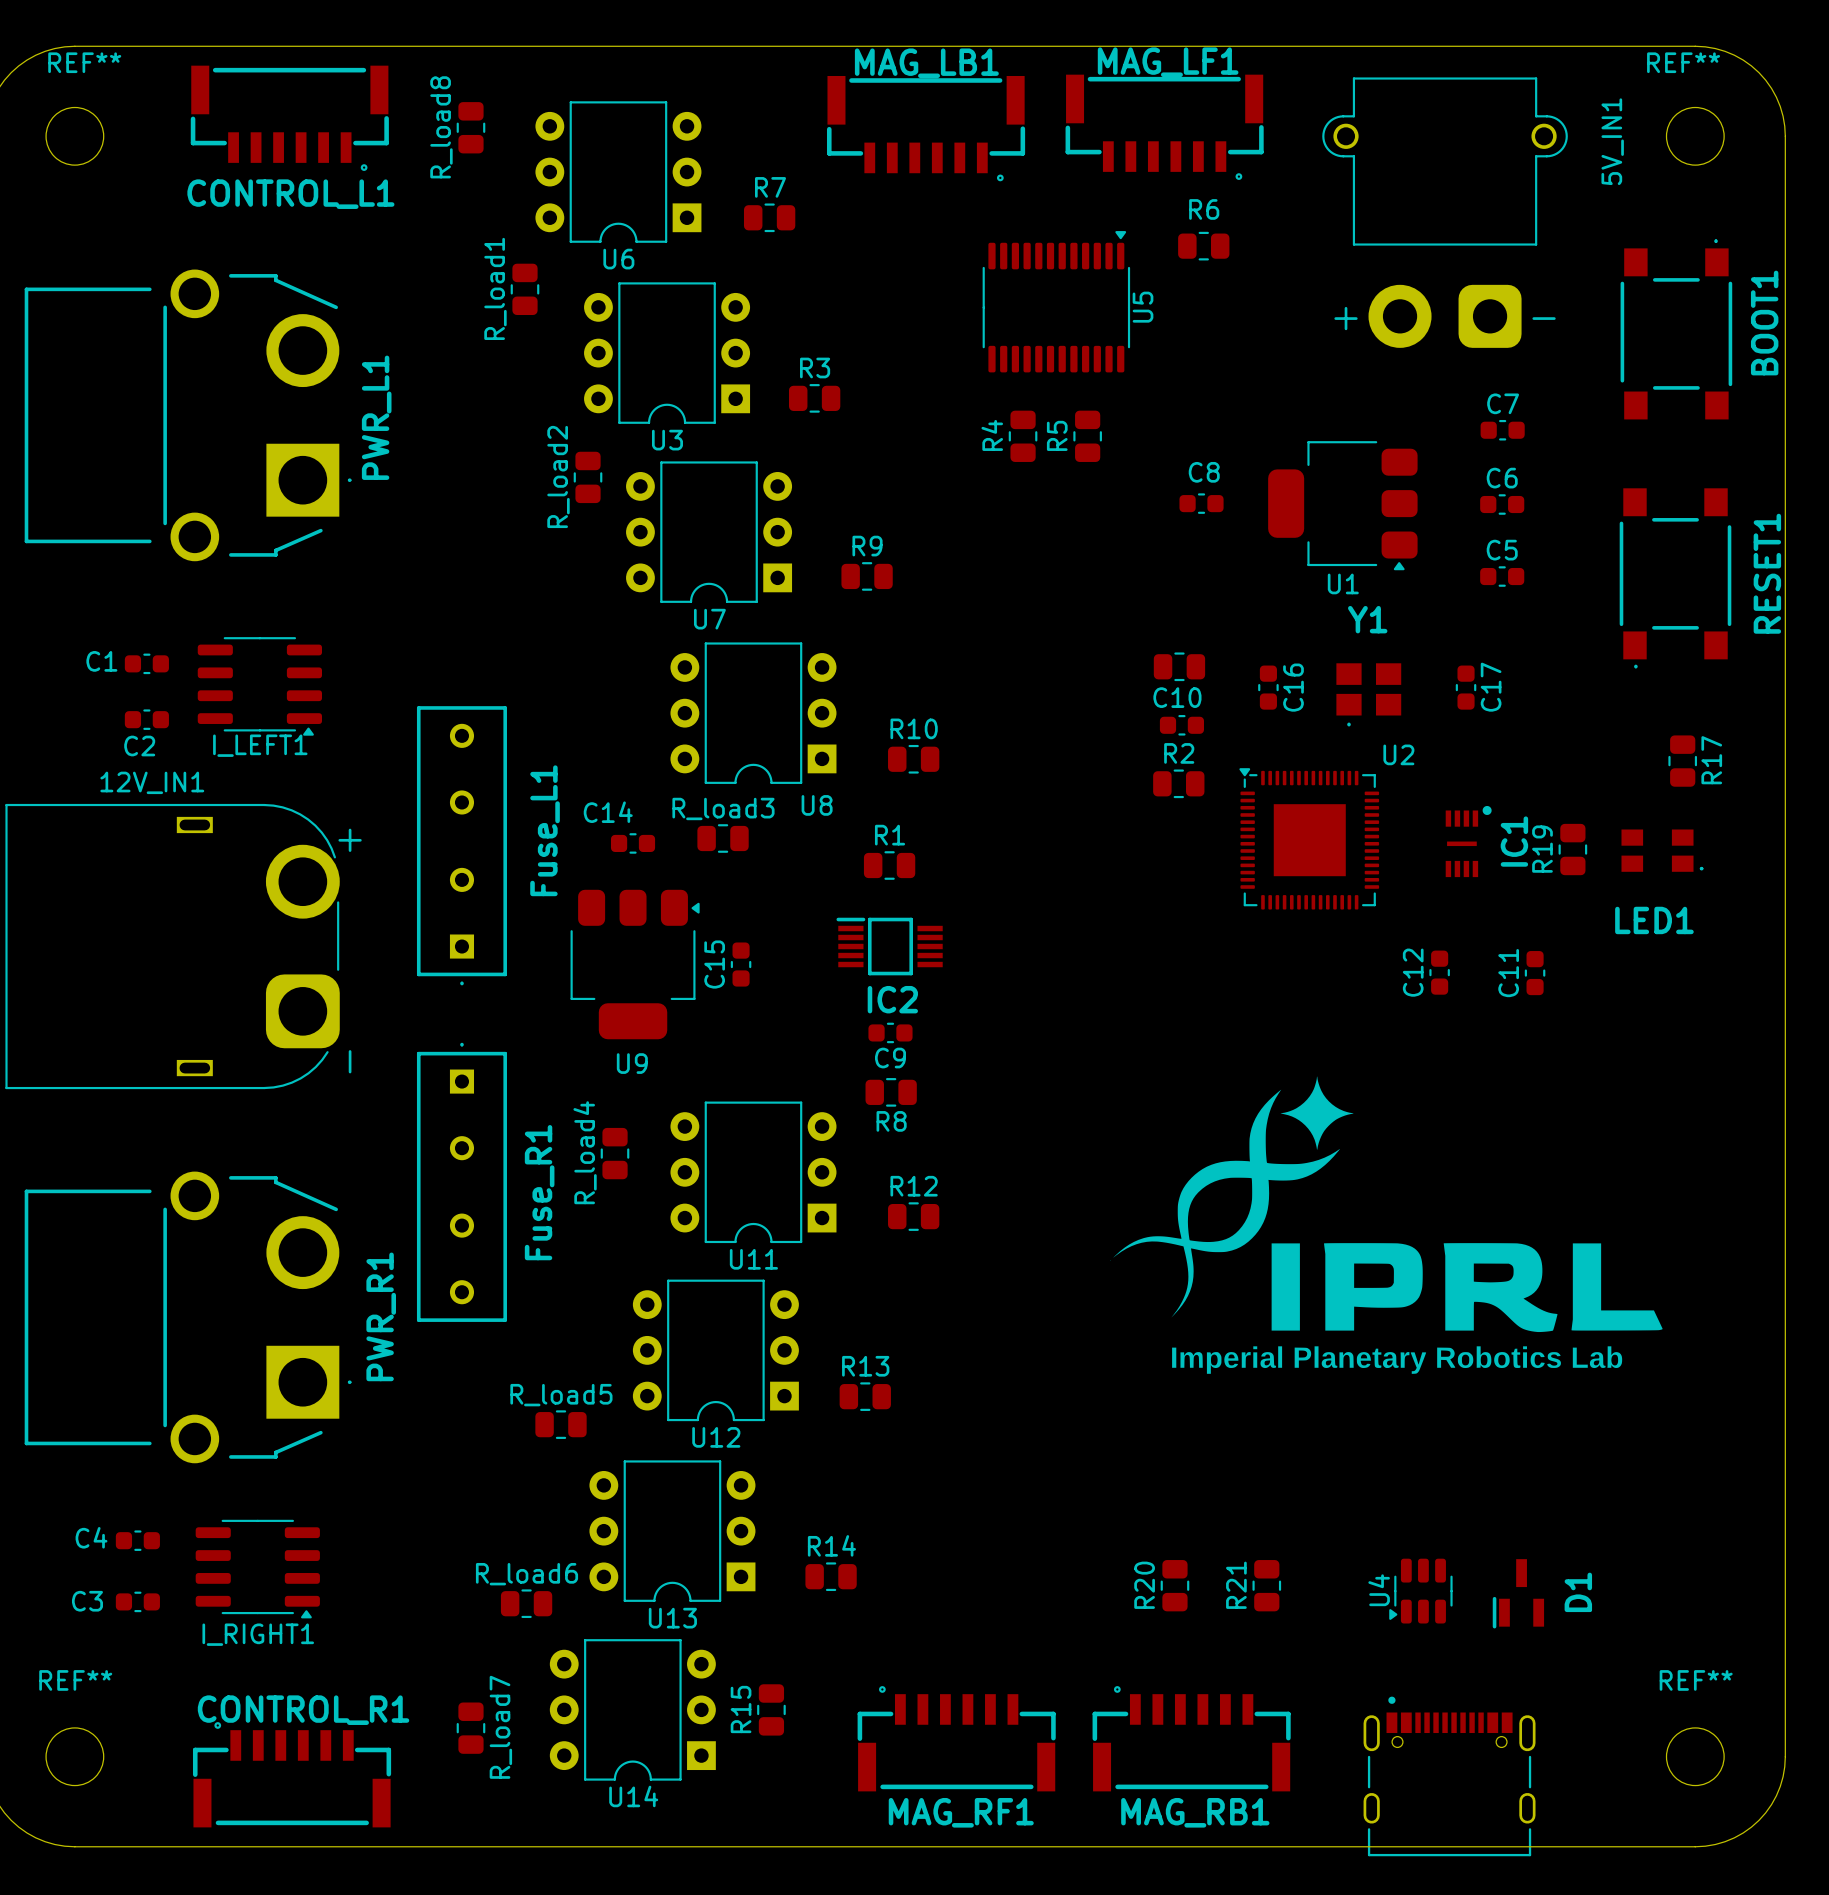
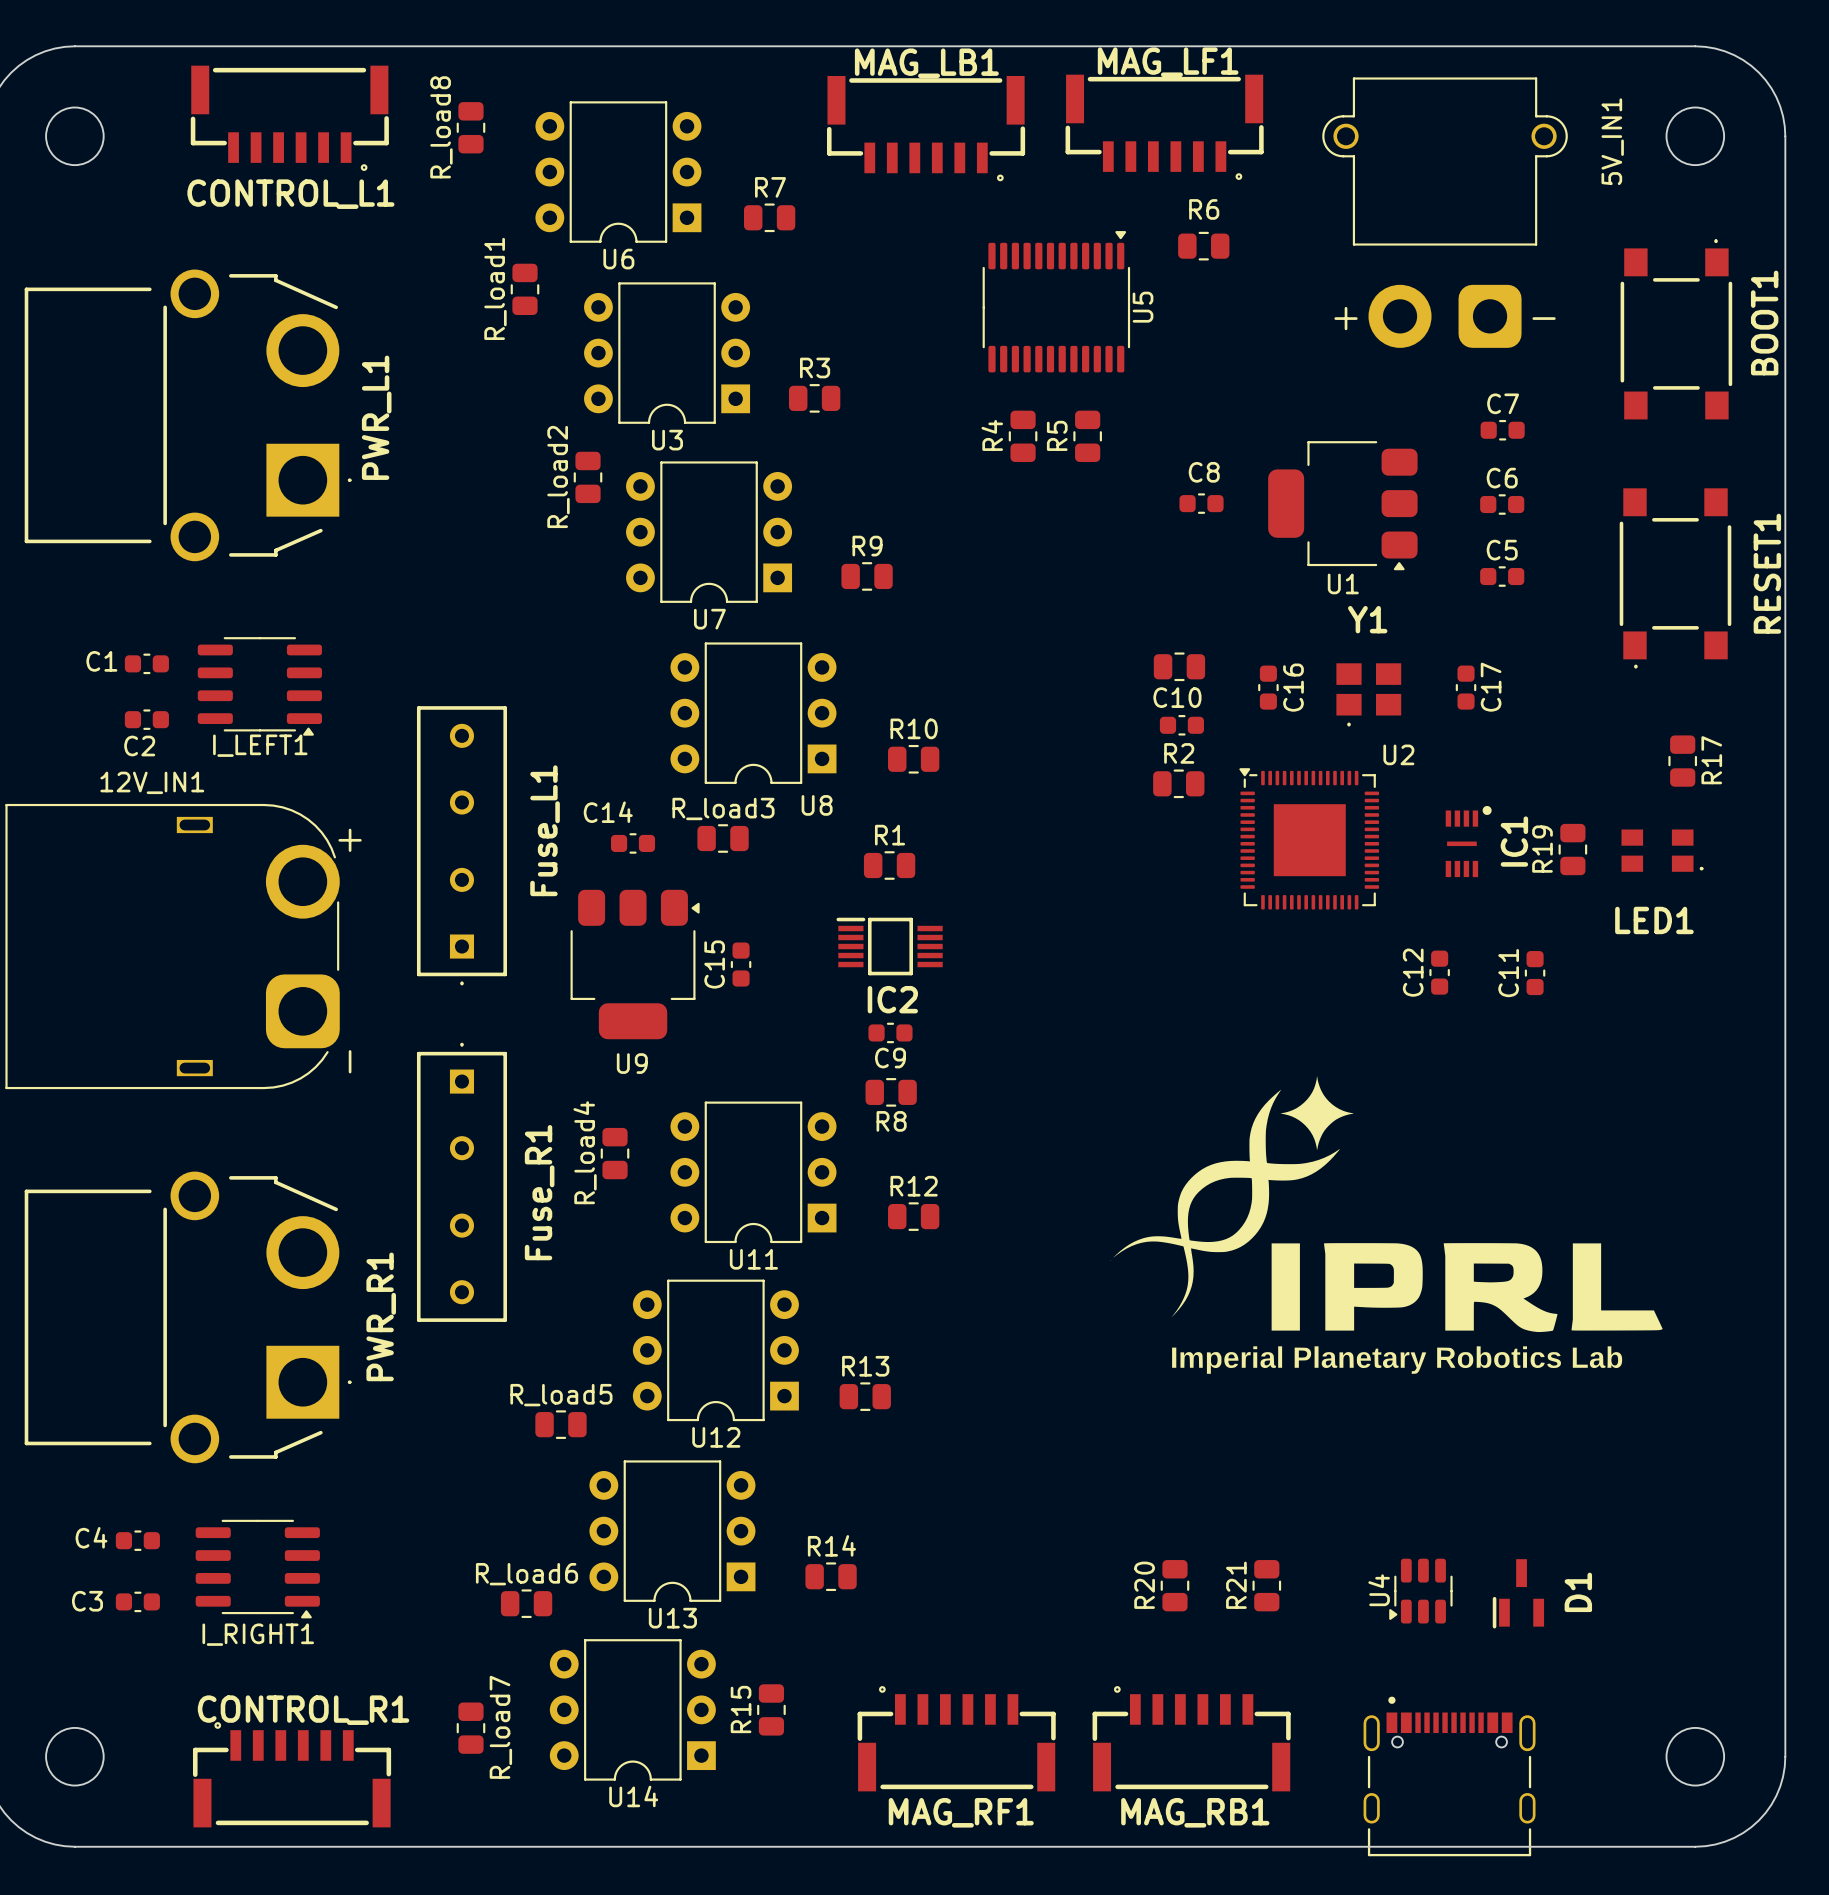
REF** name: REF** (84, 62) -> none
REF** name: REF** (1683, 62) -> none
REF** name: REF** (75, 1680) -> none
REF** name: REF** (1696, 1680) -> none

